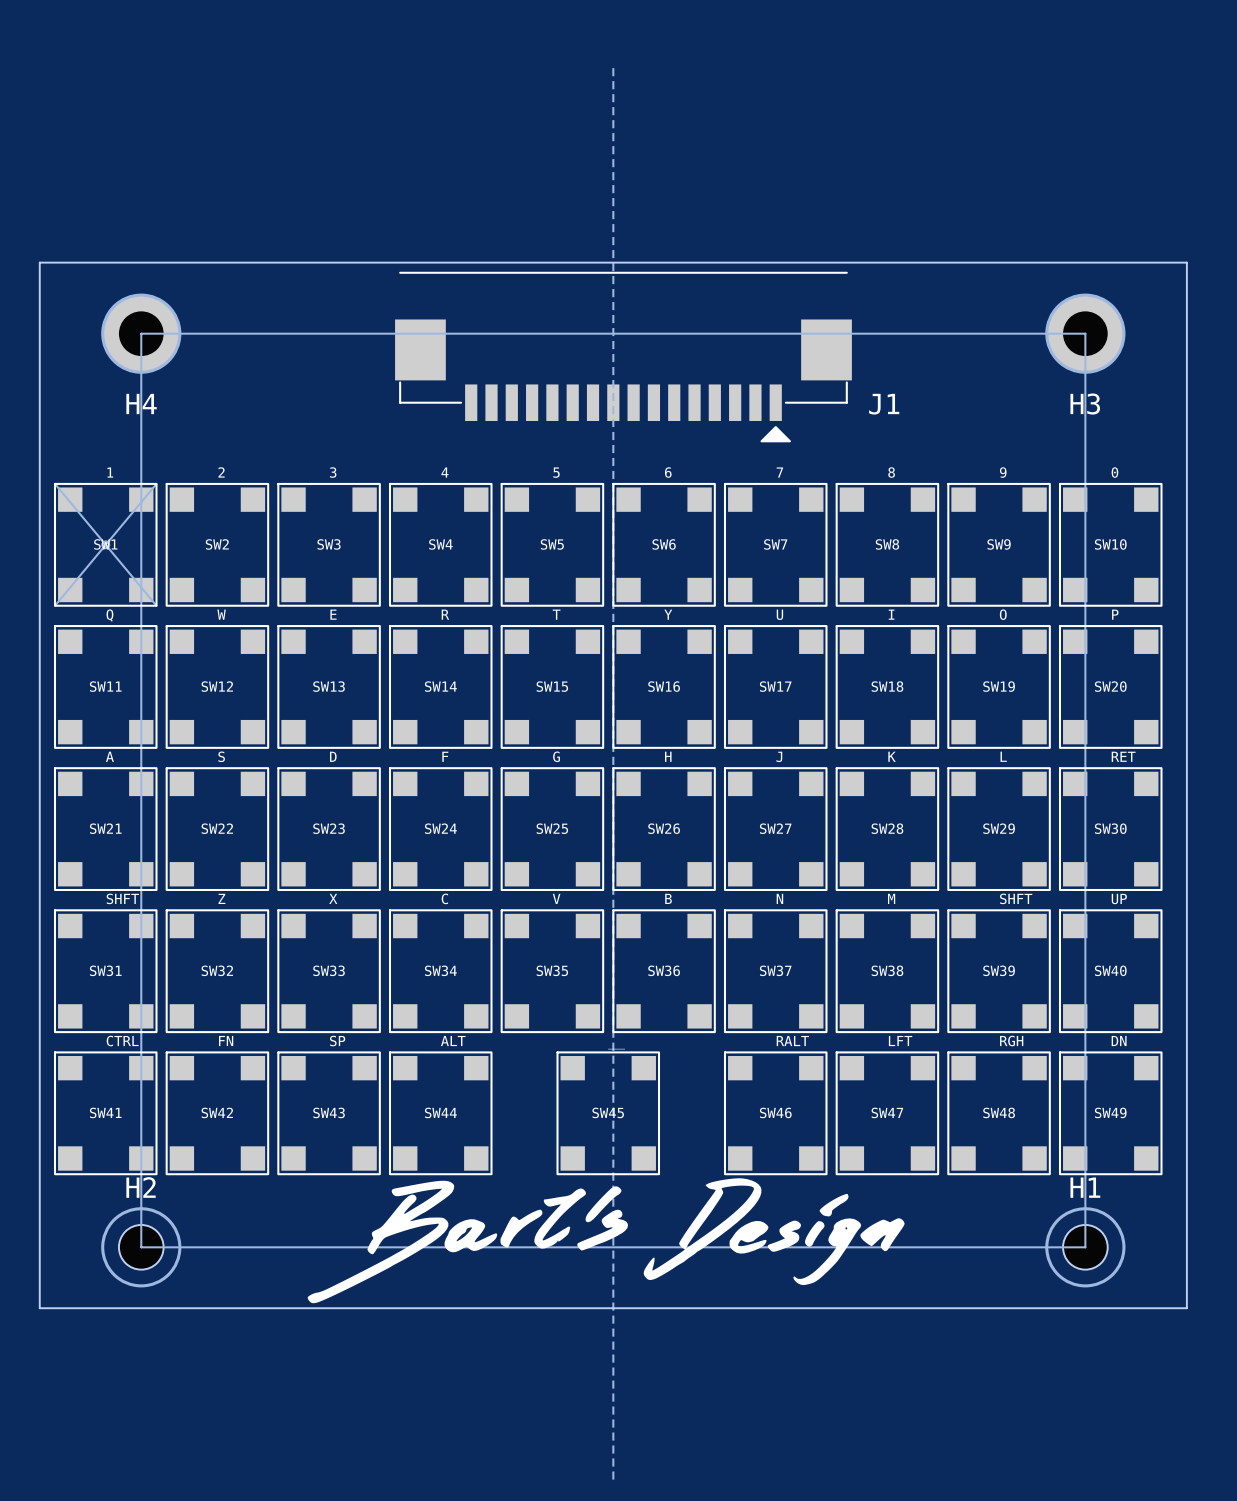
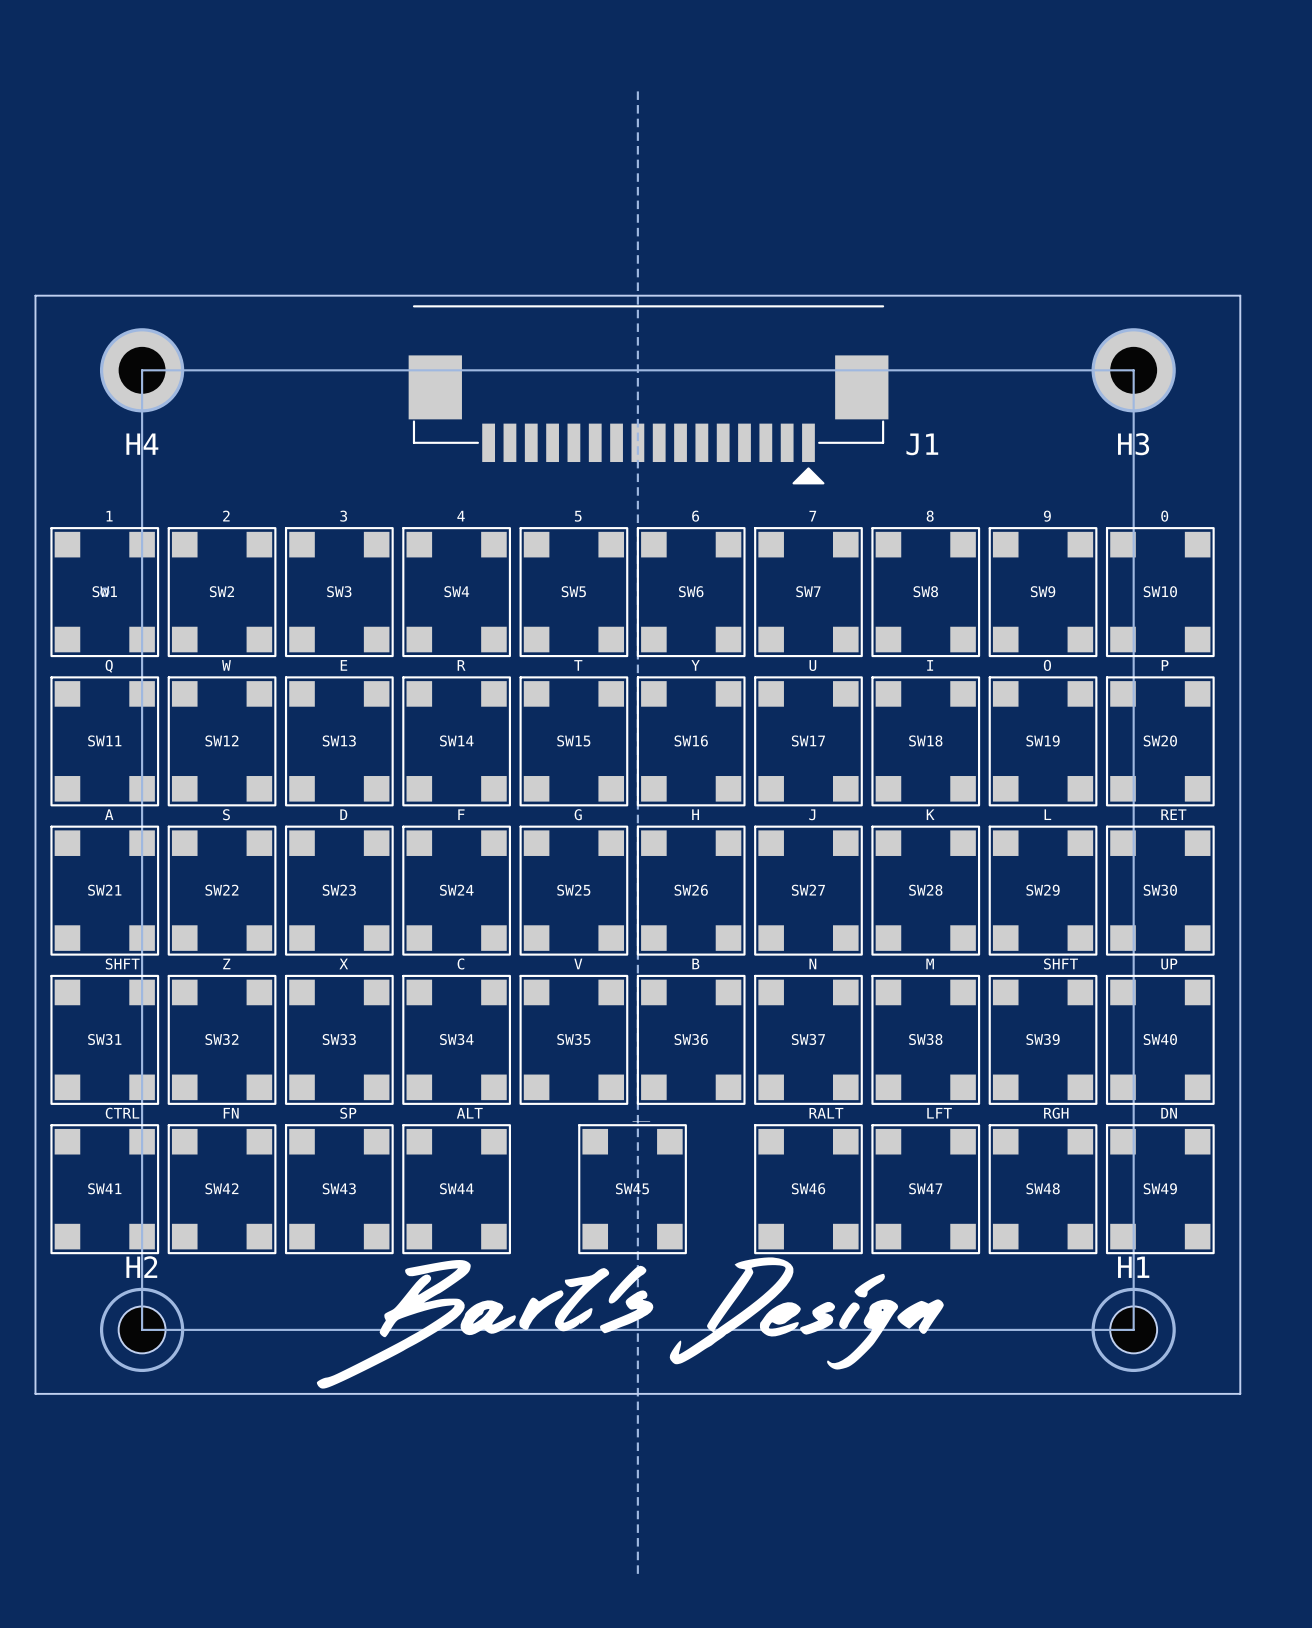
line: (54, 483) (156, 605) -> none
line: (156, 483) (54, 605) -> none

